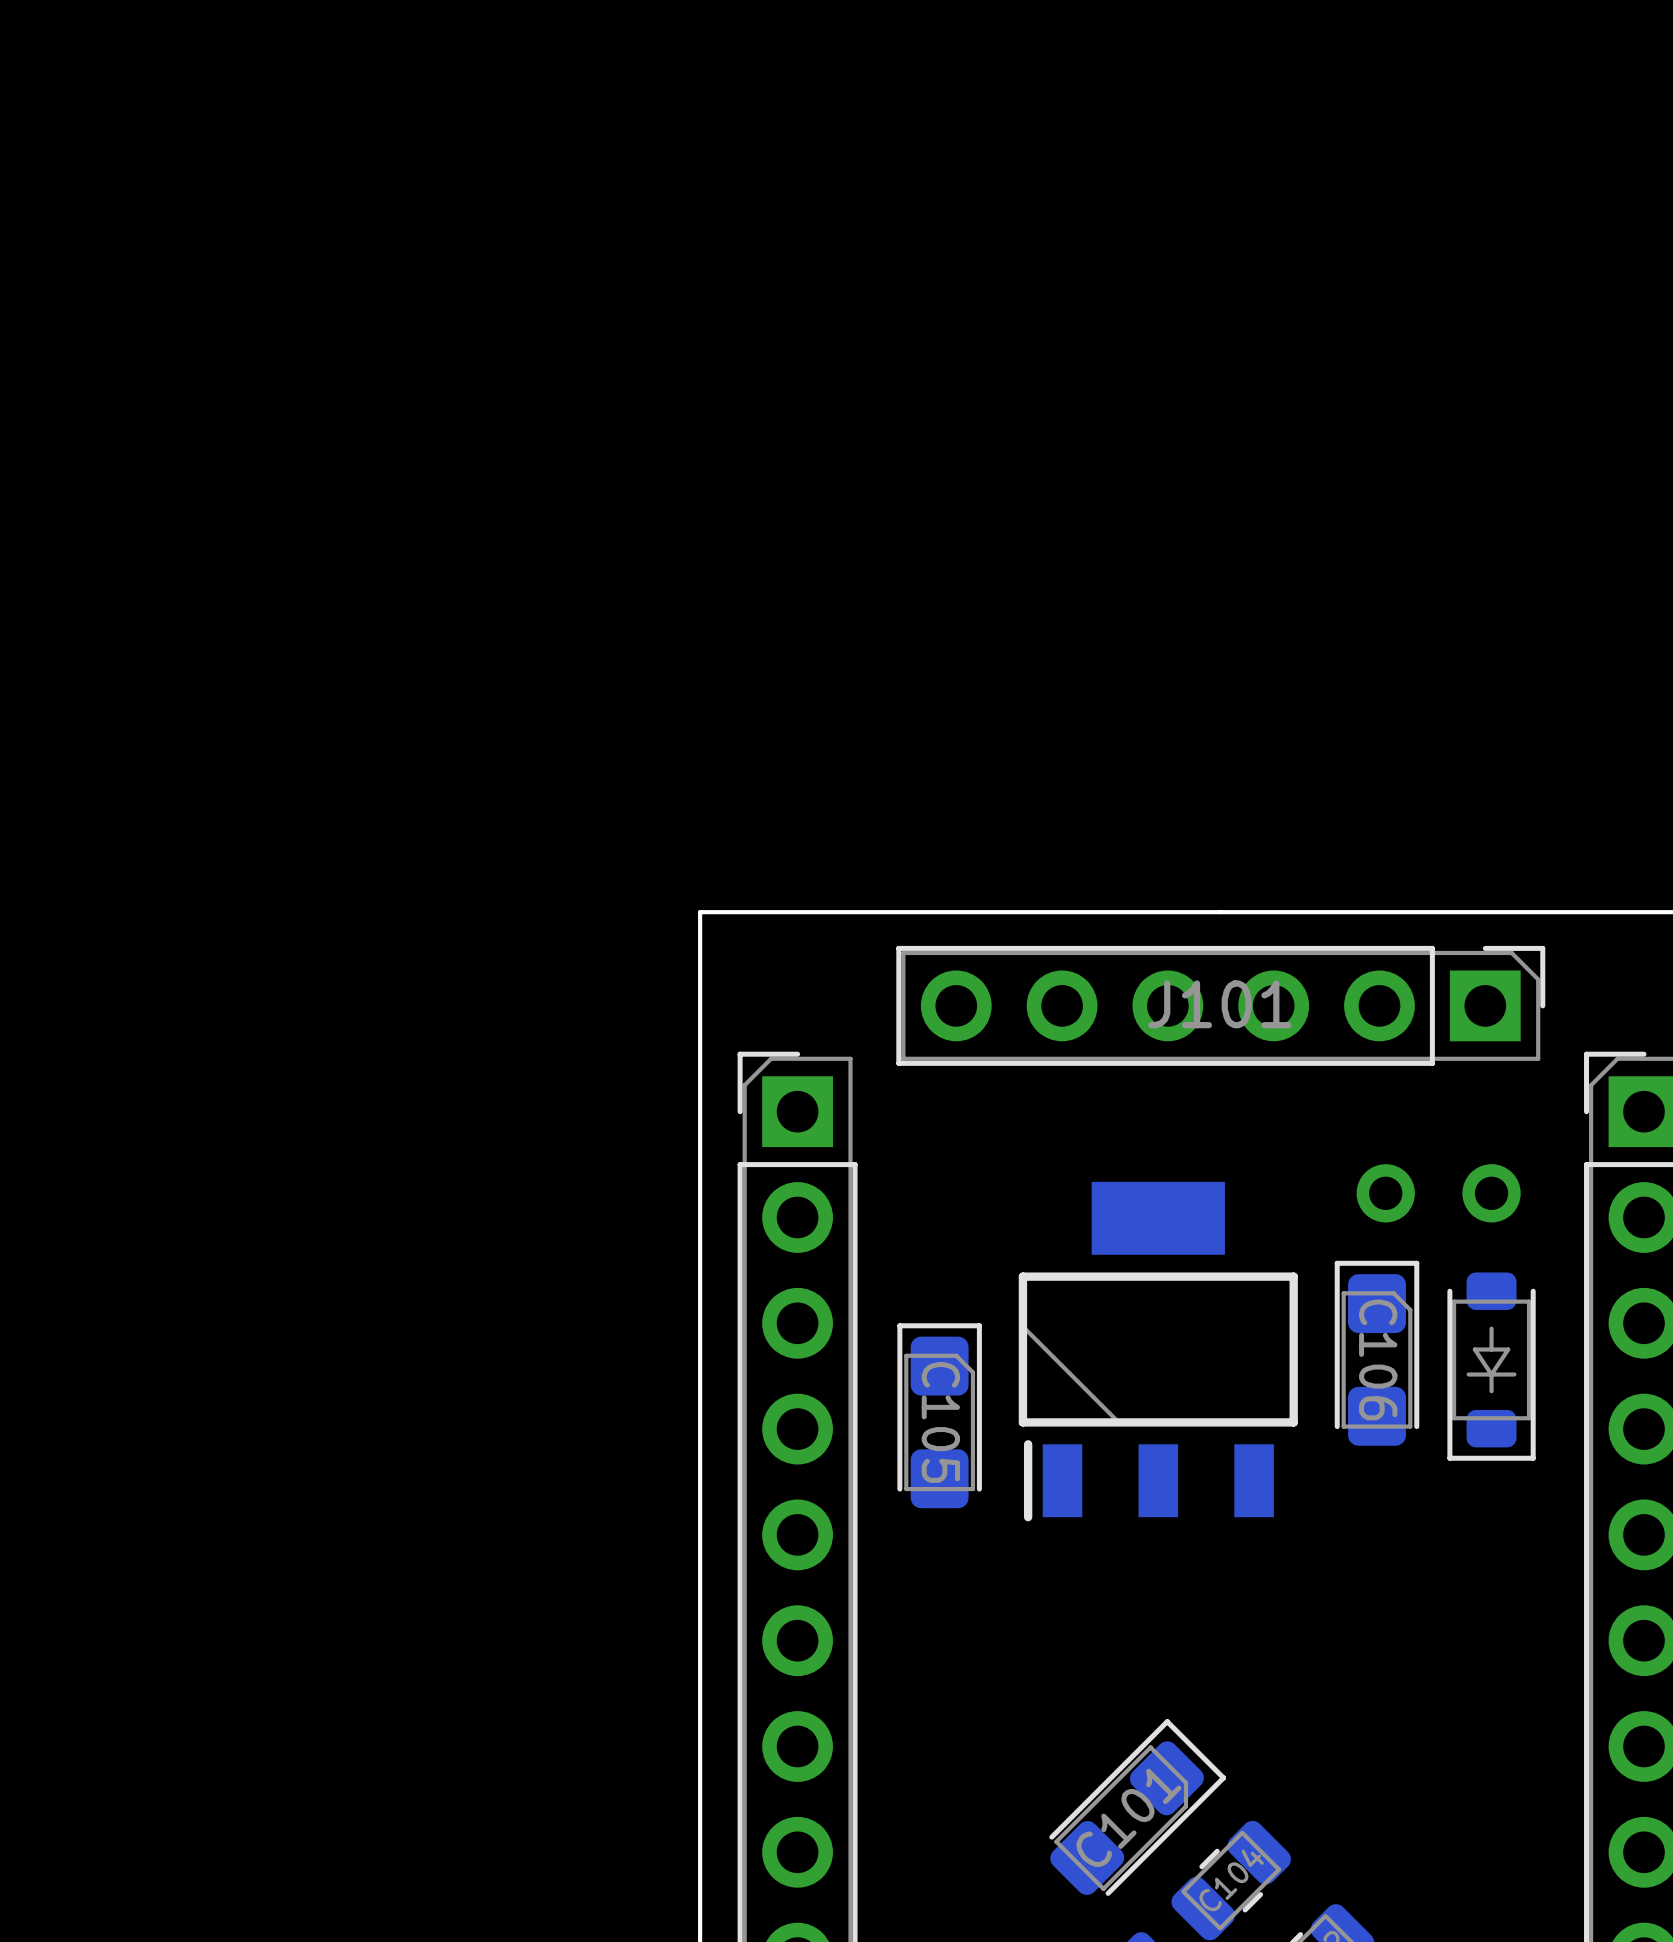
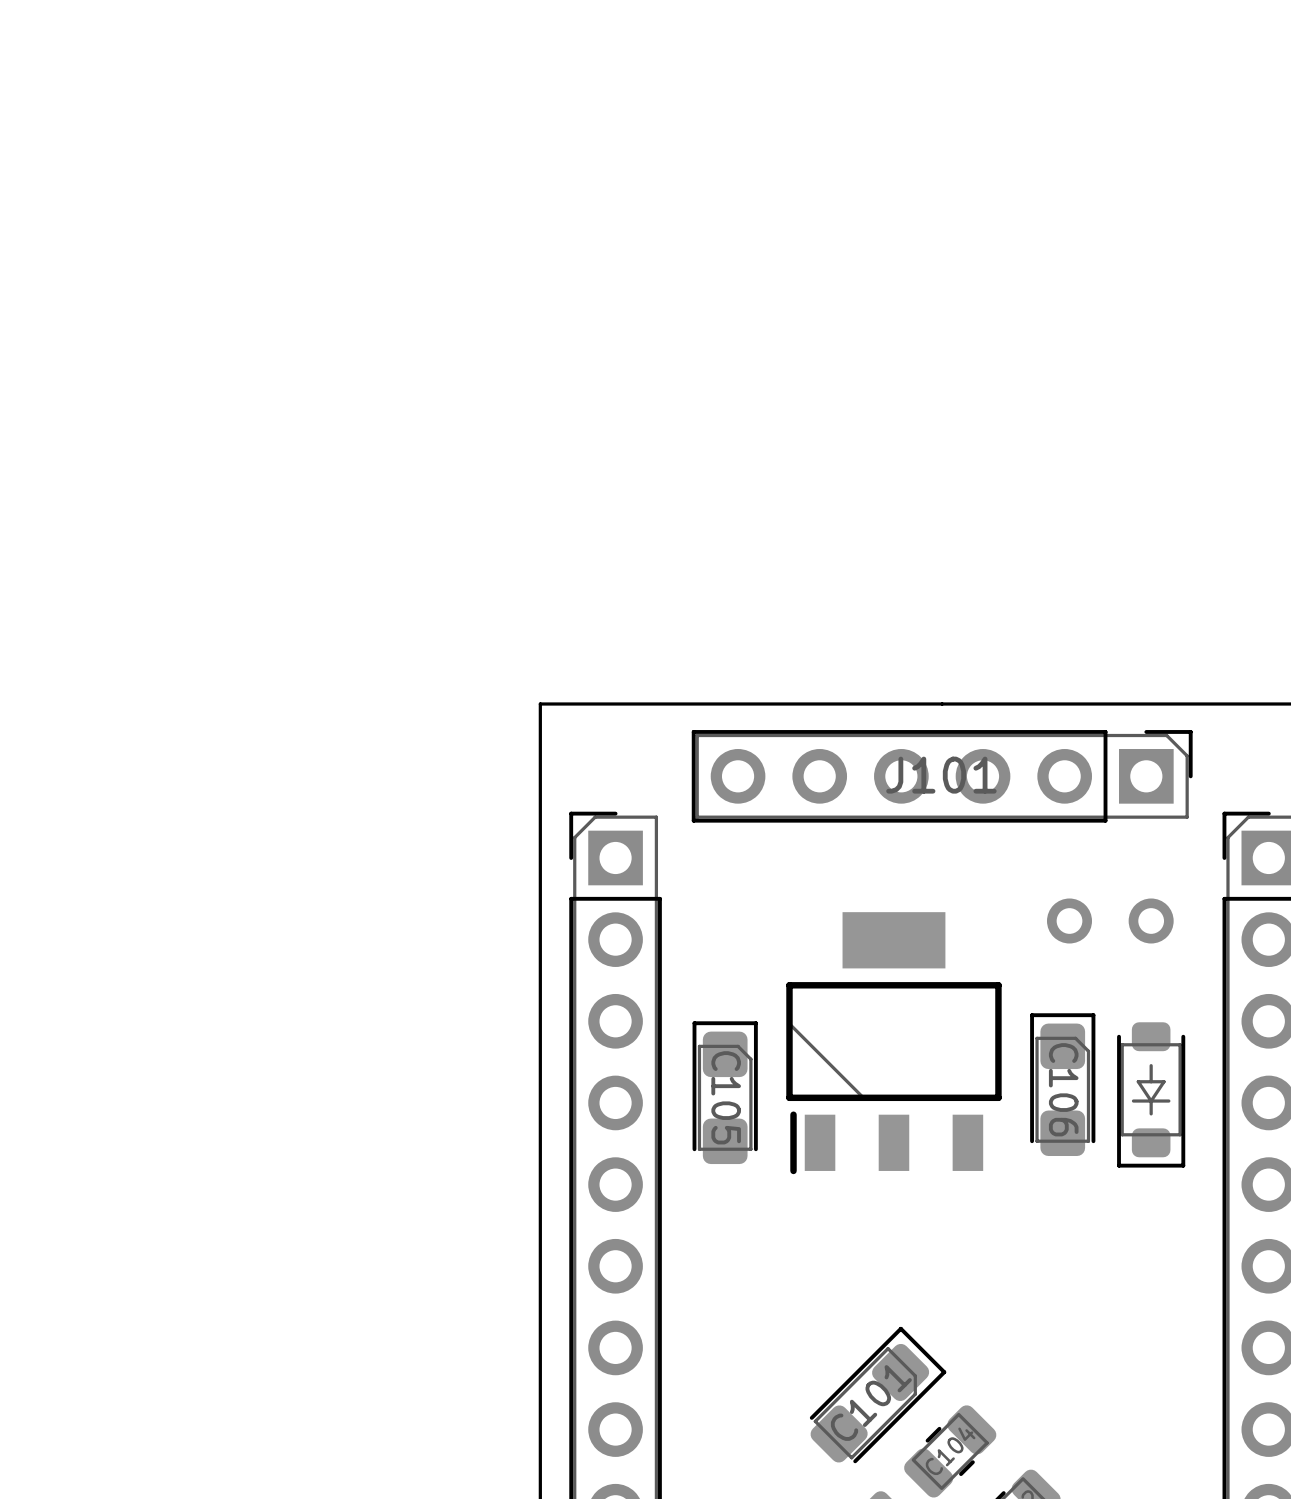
C106 position: (1376, 1353) -> (1062, 1084)
part position: (1491, 1366) -> (1151, 1094)

